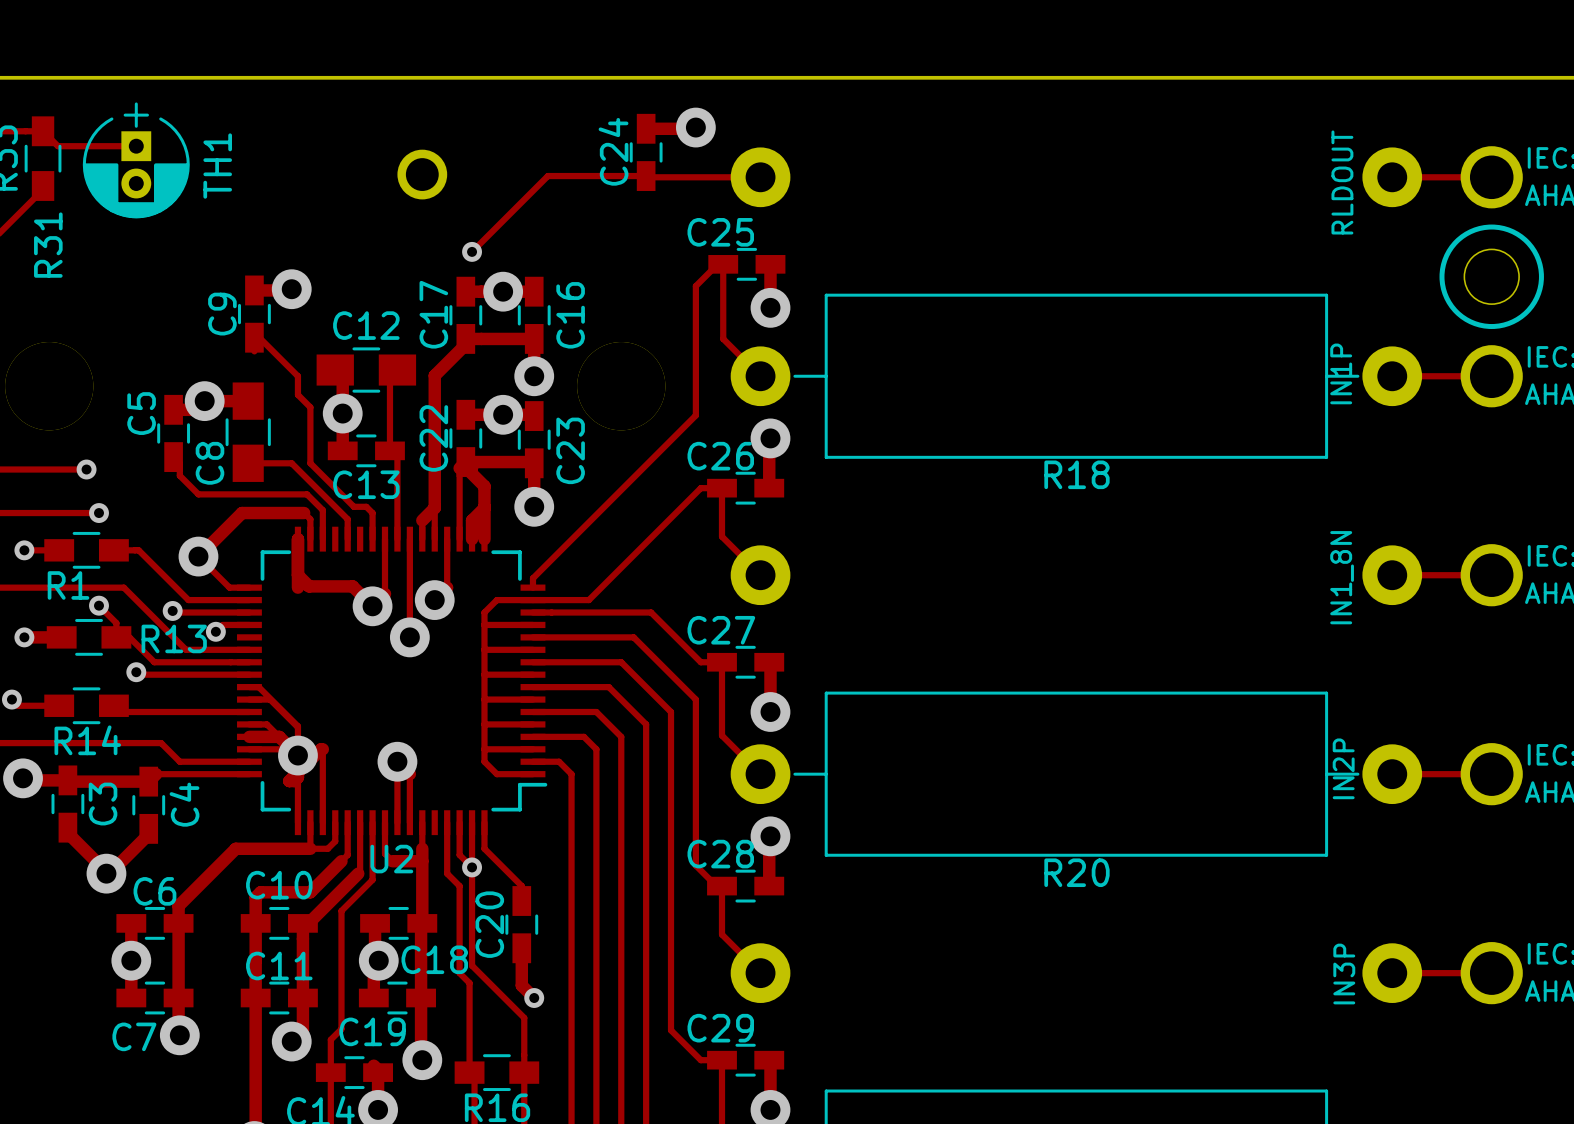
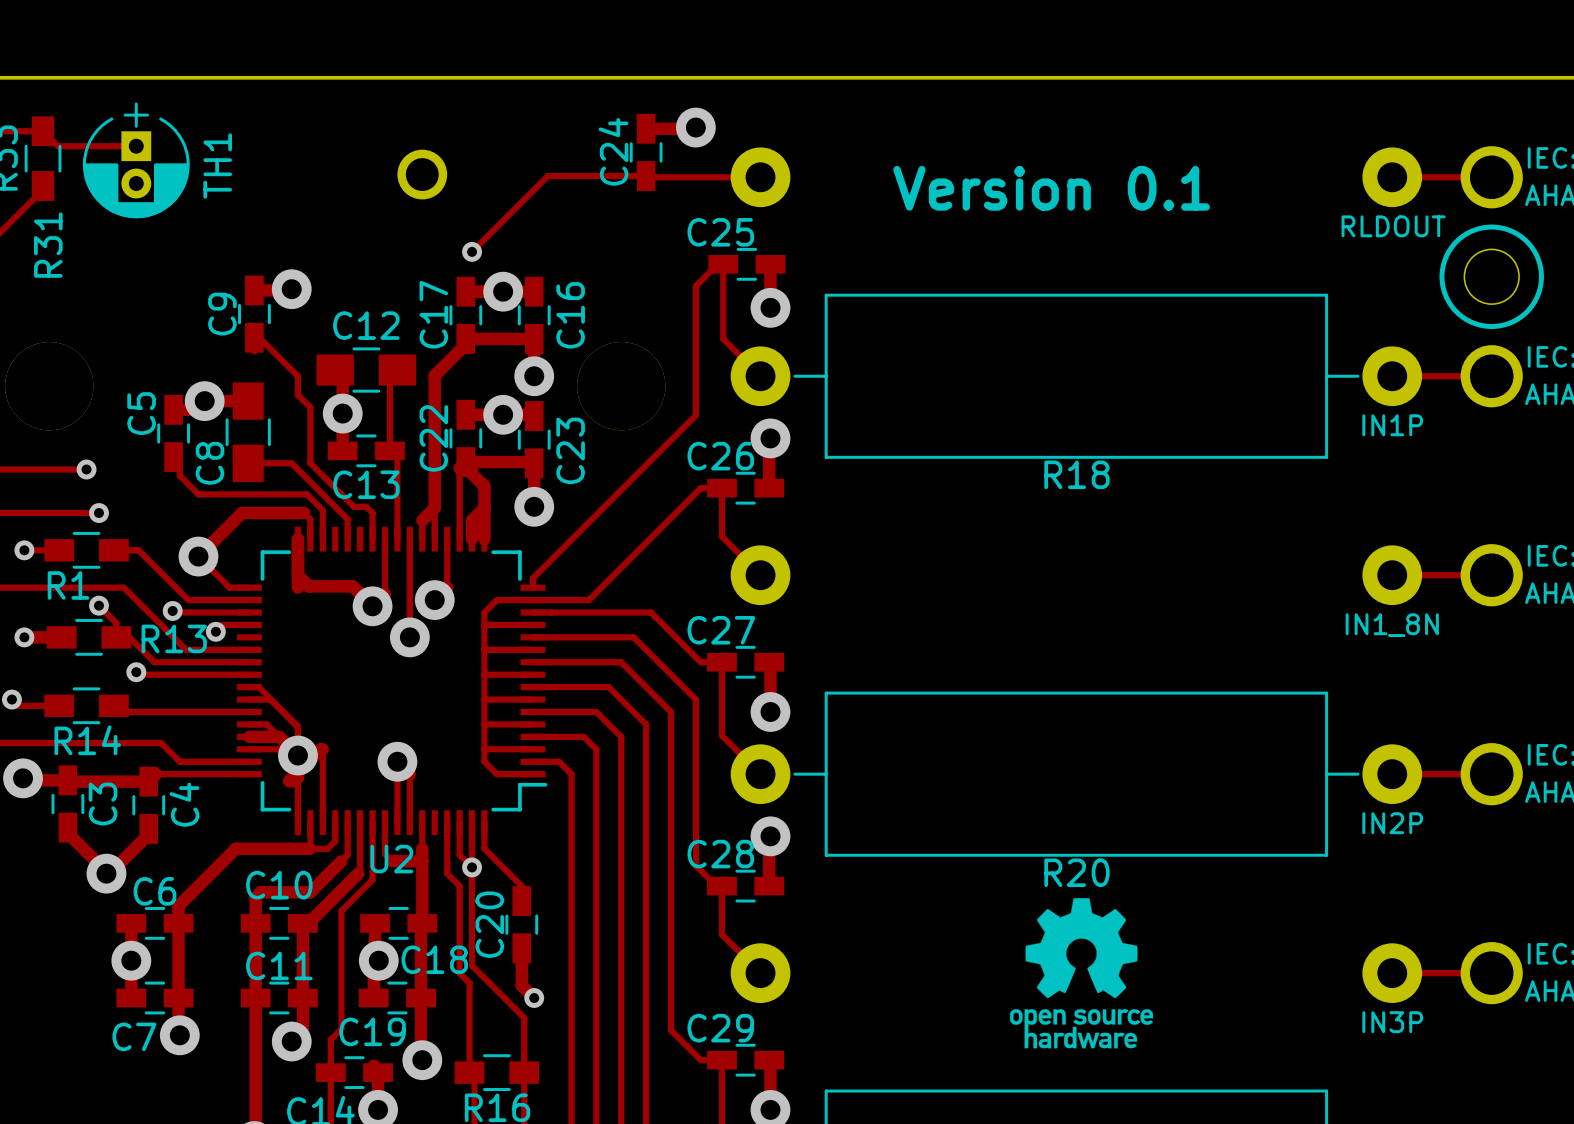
text rotation: 0° (1342, 182) -> 90° clockwise (1393, 226)
text: none -> Version 0.1 (1051, 188)
text rotation: 0° (1341, 373) -> 90° clockwise (1392, 425)
text rotation: 0° (1342, 577) -> 90° clockwise (1392, 625)
text rotation: 0° (1343, 768) -> 90° clockwise (1392, 823)
drawing: none -> [1009, 898, 1154, 1049]
text rotation: 0° (1344, 974) -> 90° clockwise (1392, 1022)

